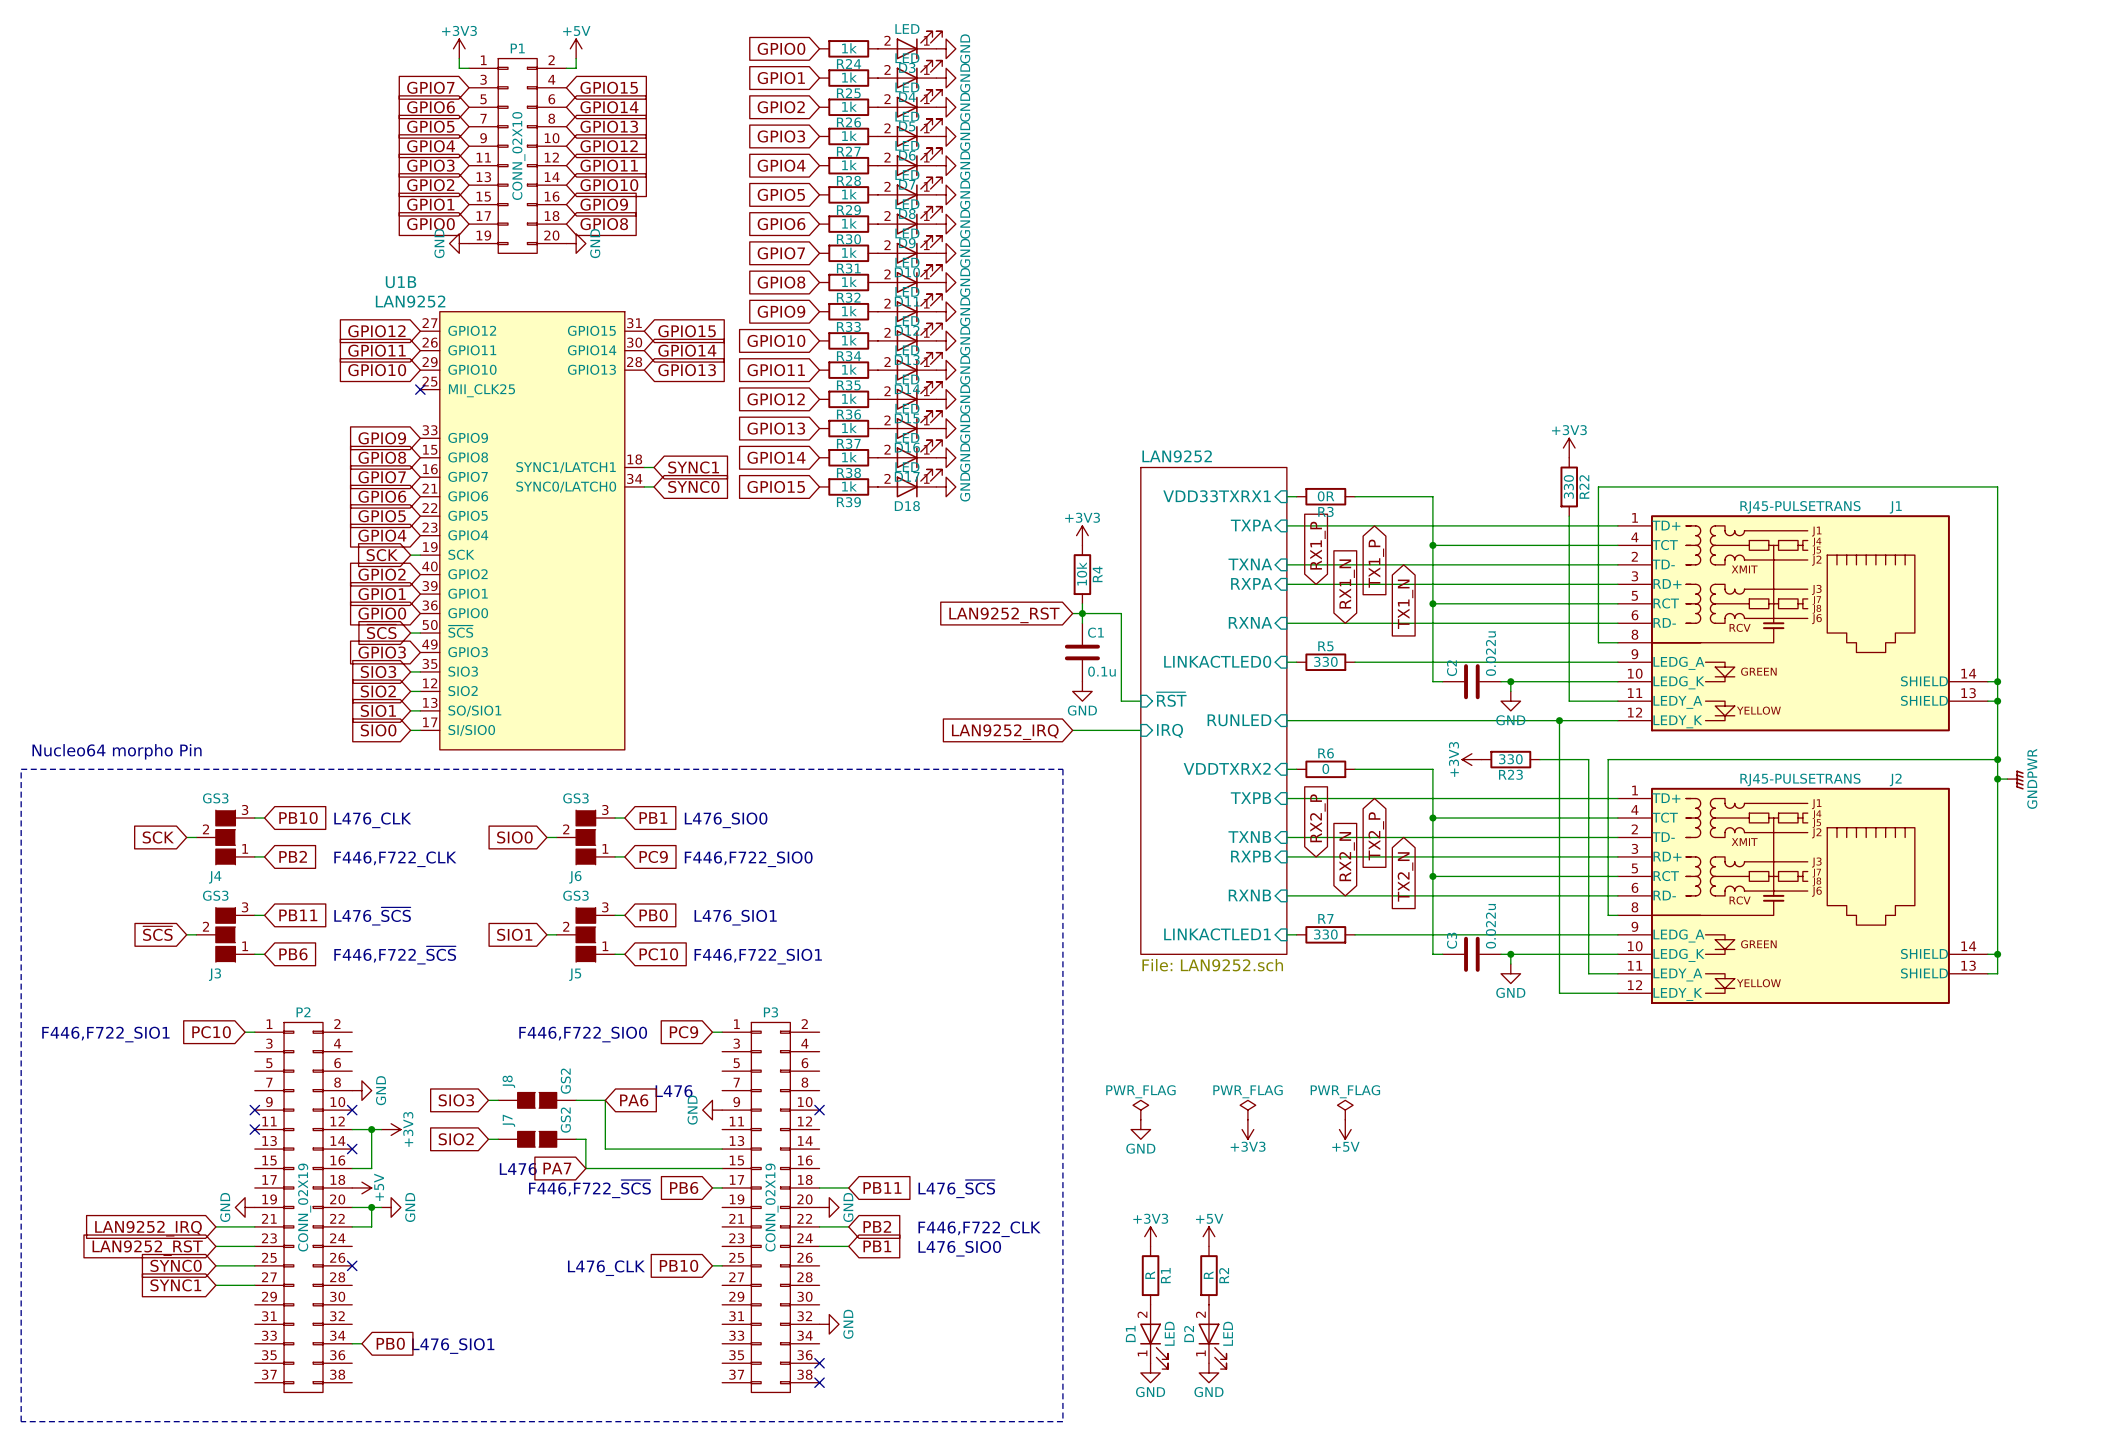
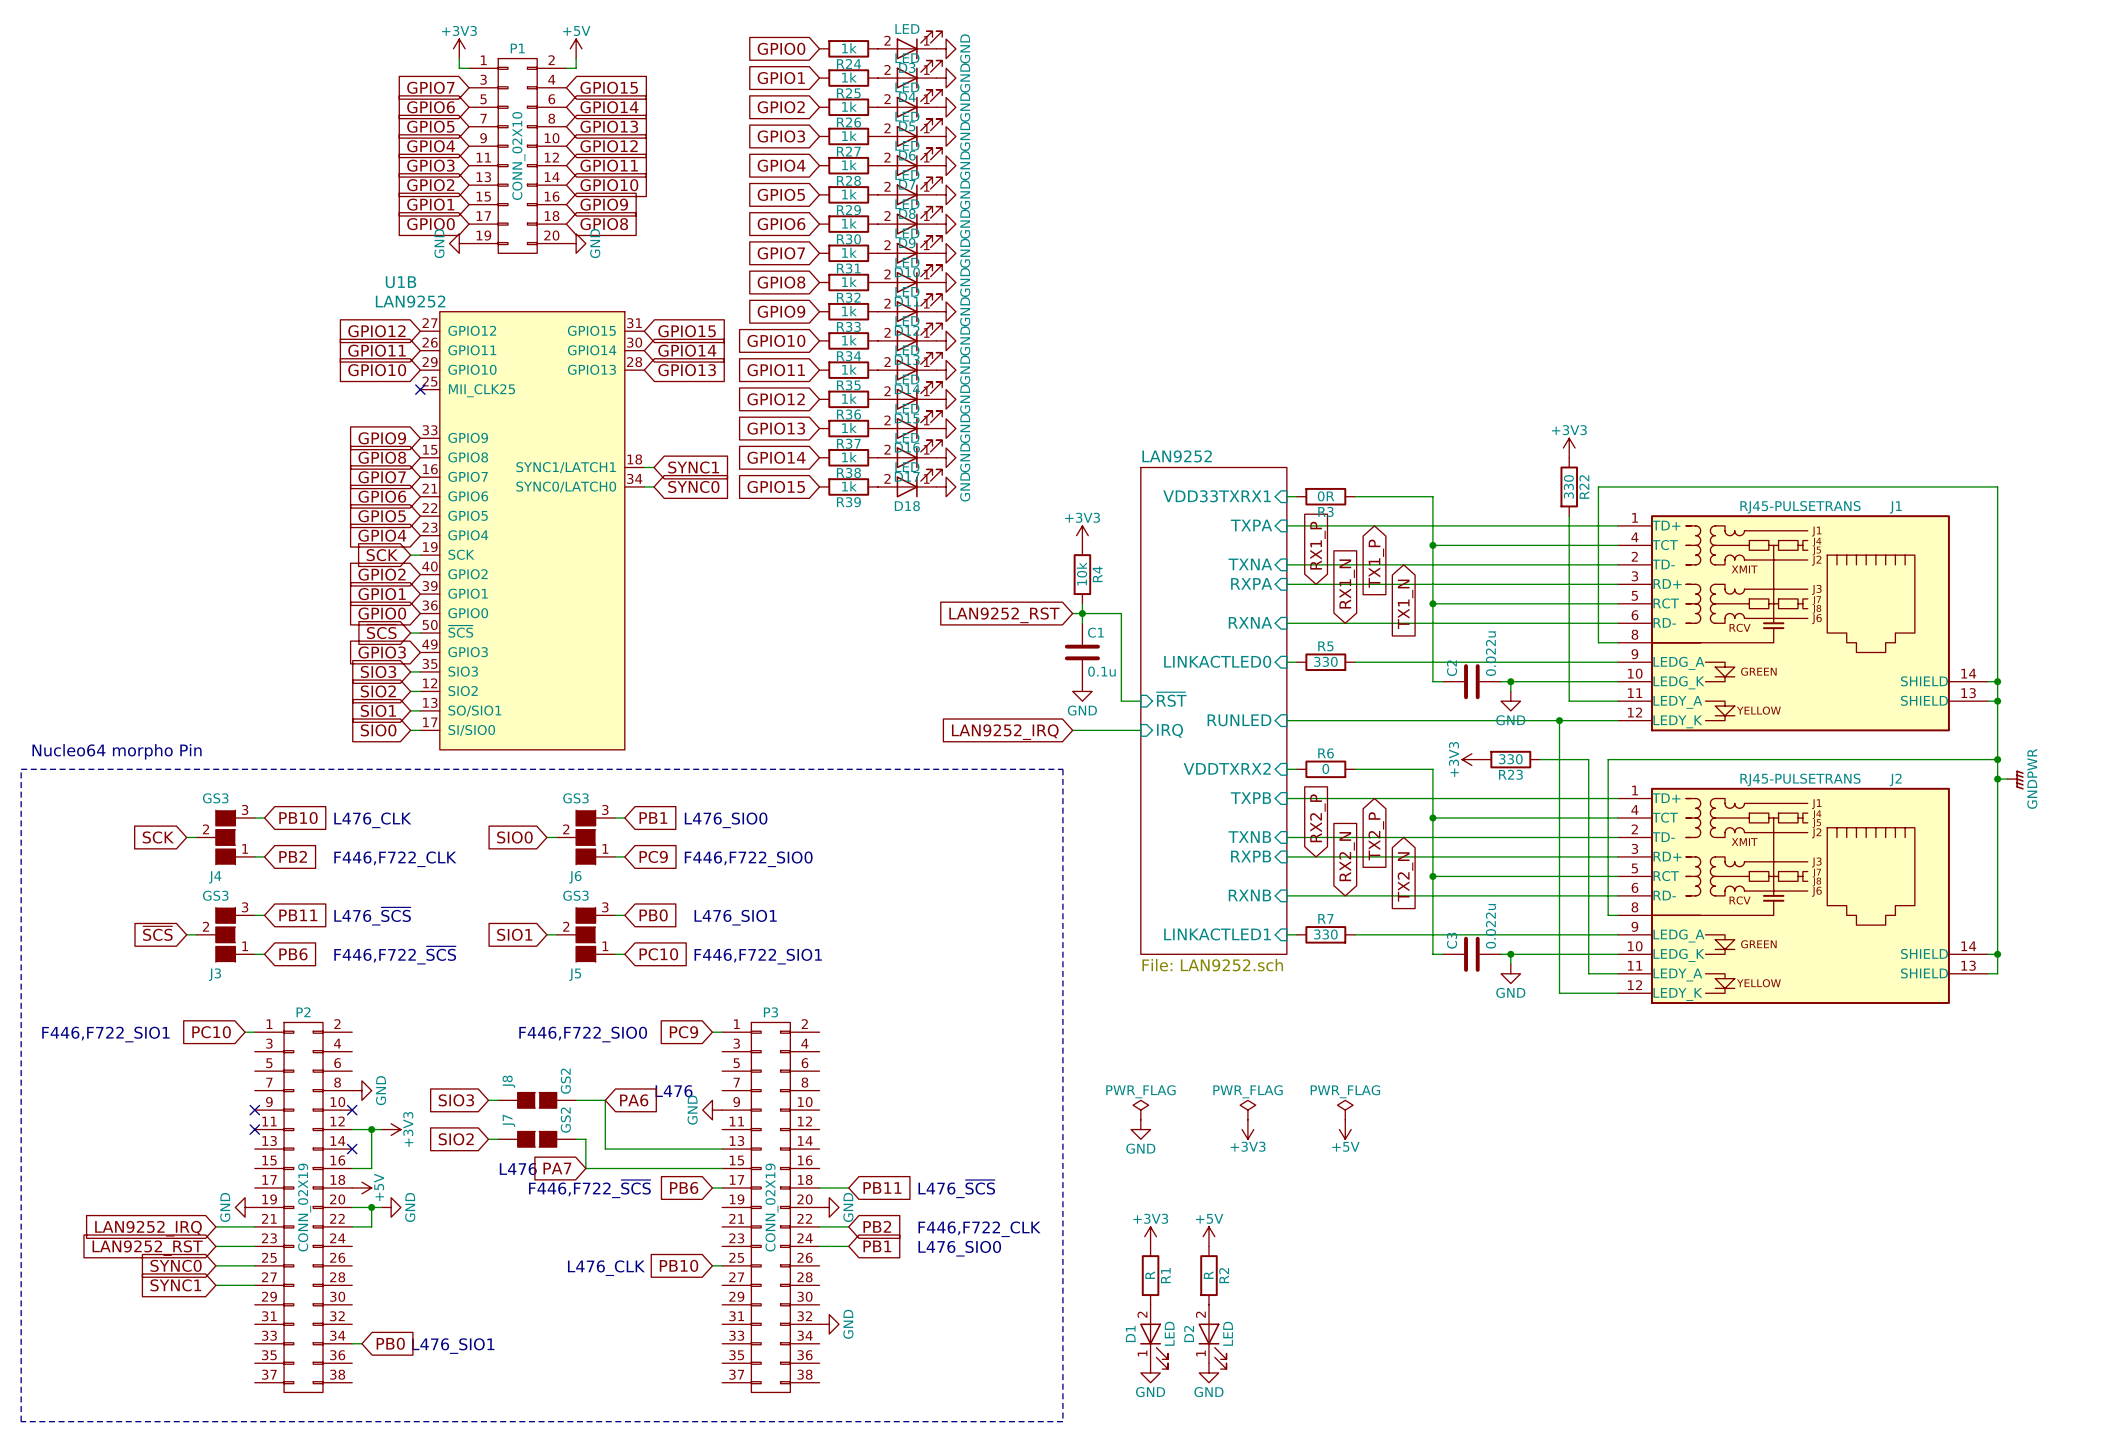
no-connect mark: (819, 1110) -> none
no-connect mark: (352, 1265) -> none
no-connect mark: (819, 1363) -> none
no-connect mark: (819, 1382) -> none

